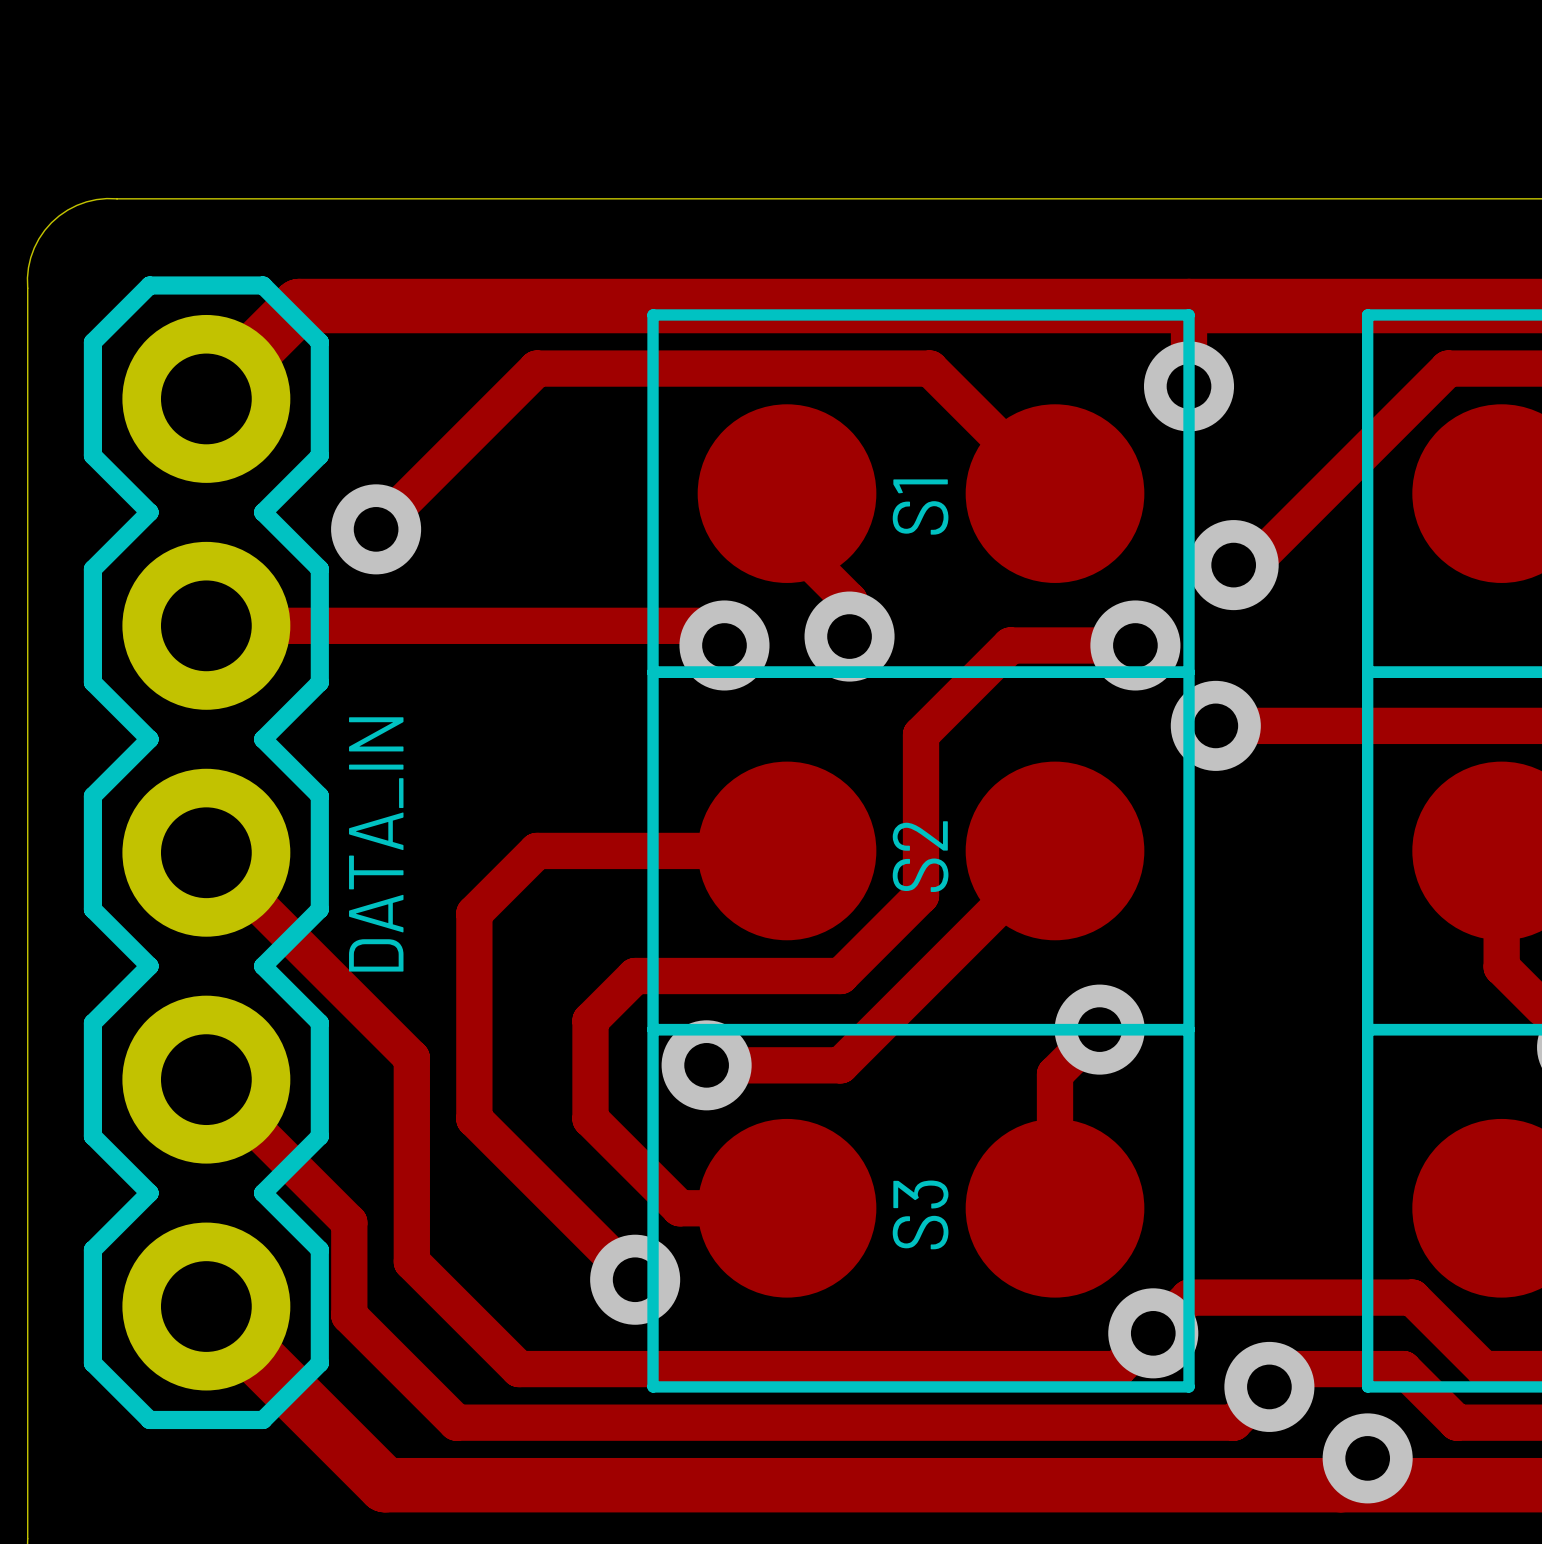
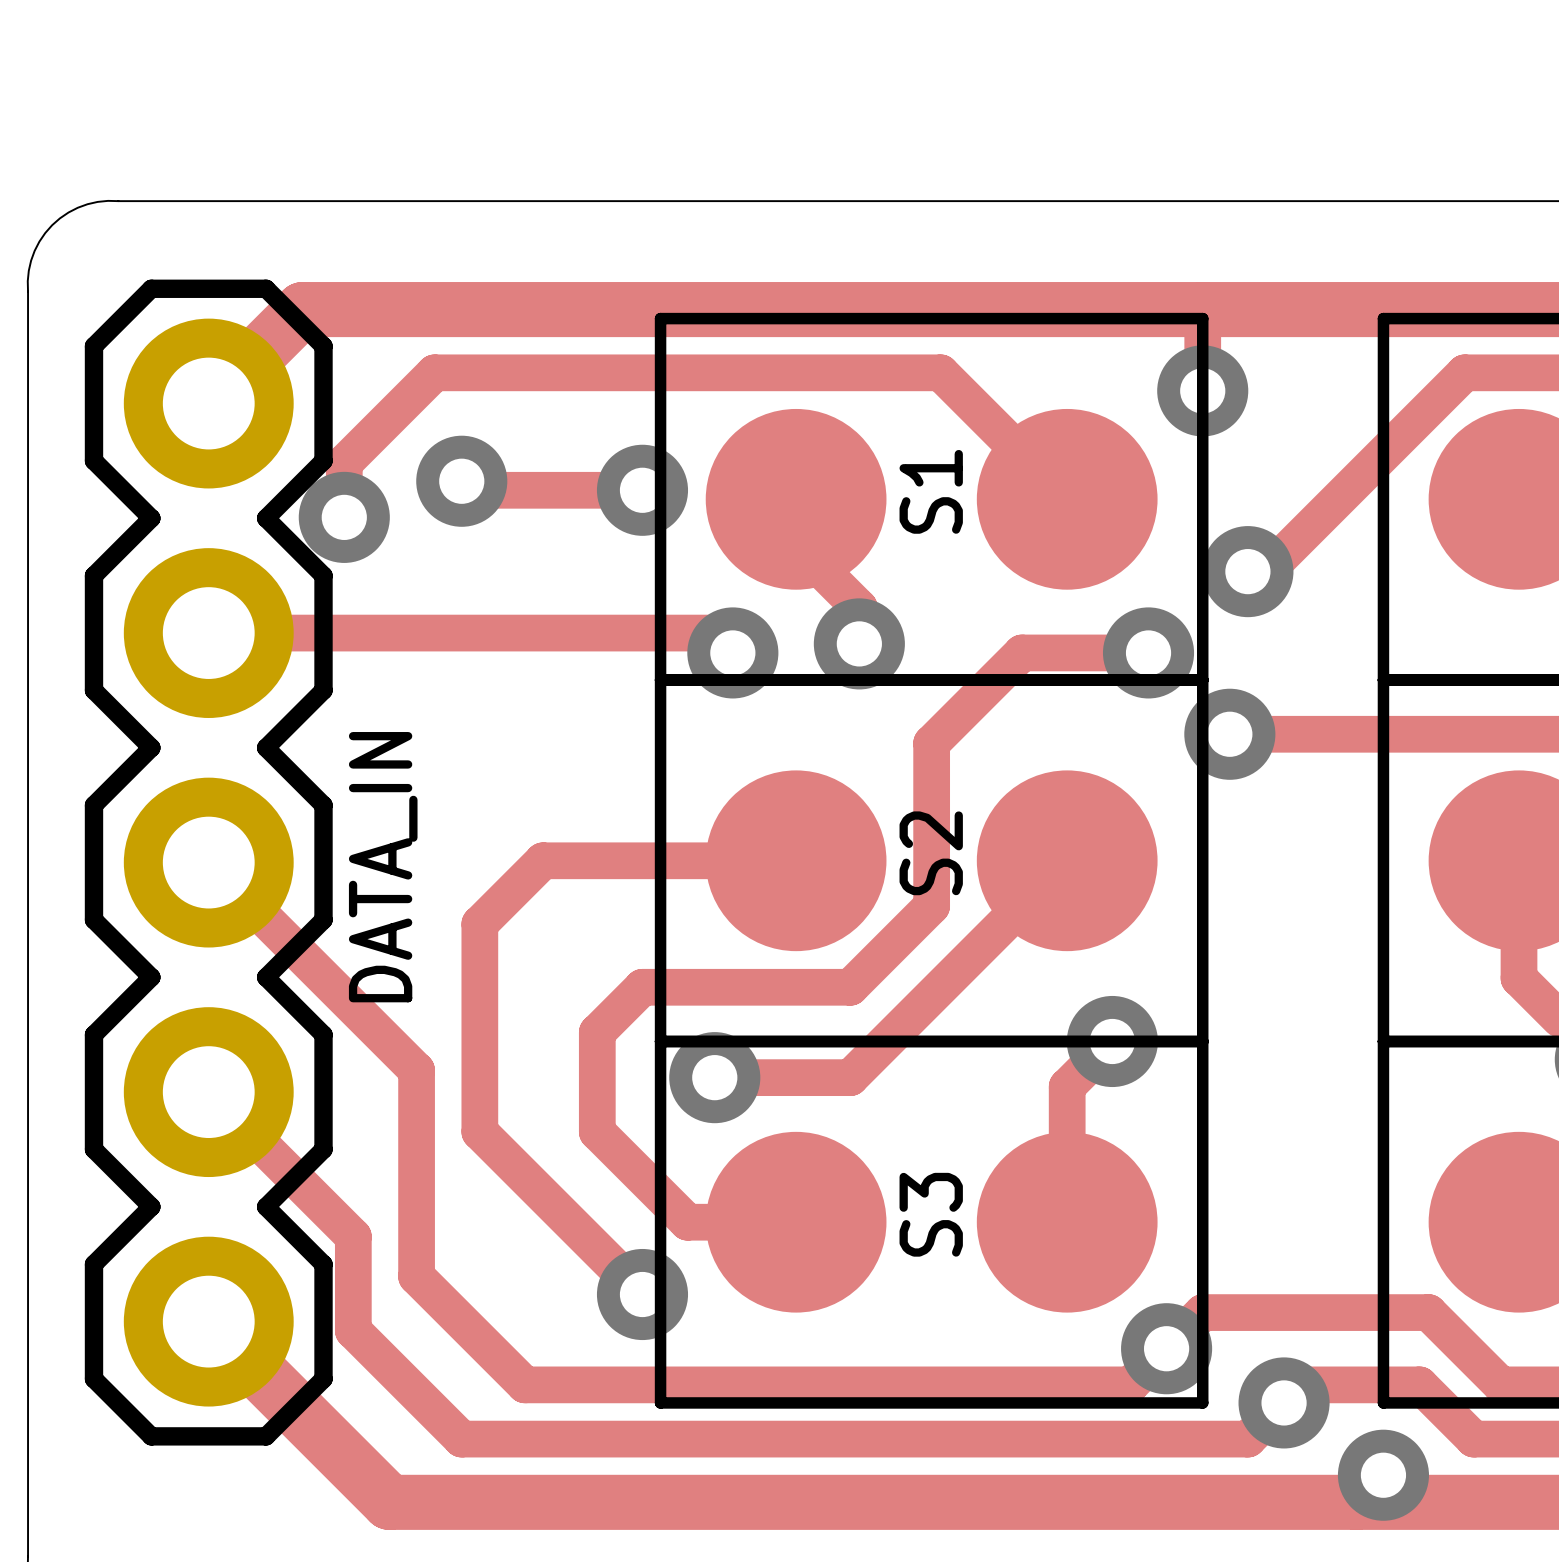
track: (536, 368) (376, 529) -> (543, 372) (434, 372) (344, 463) (344, 517)
track: none -> (461, 481) (470, 490) (642, 490)
via: none -> (461, 481)
via: none -> (642, 490)
via position: (376, 529) -> (344, 517)

